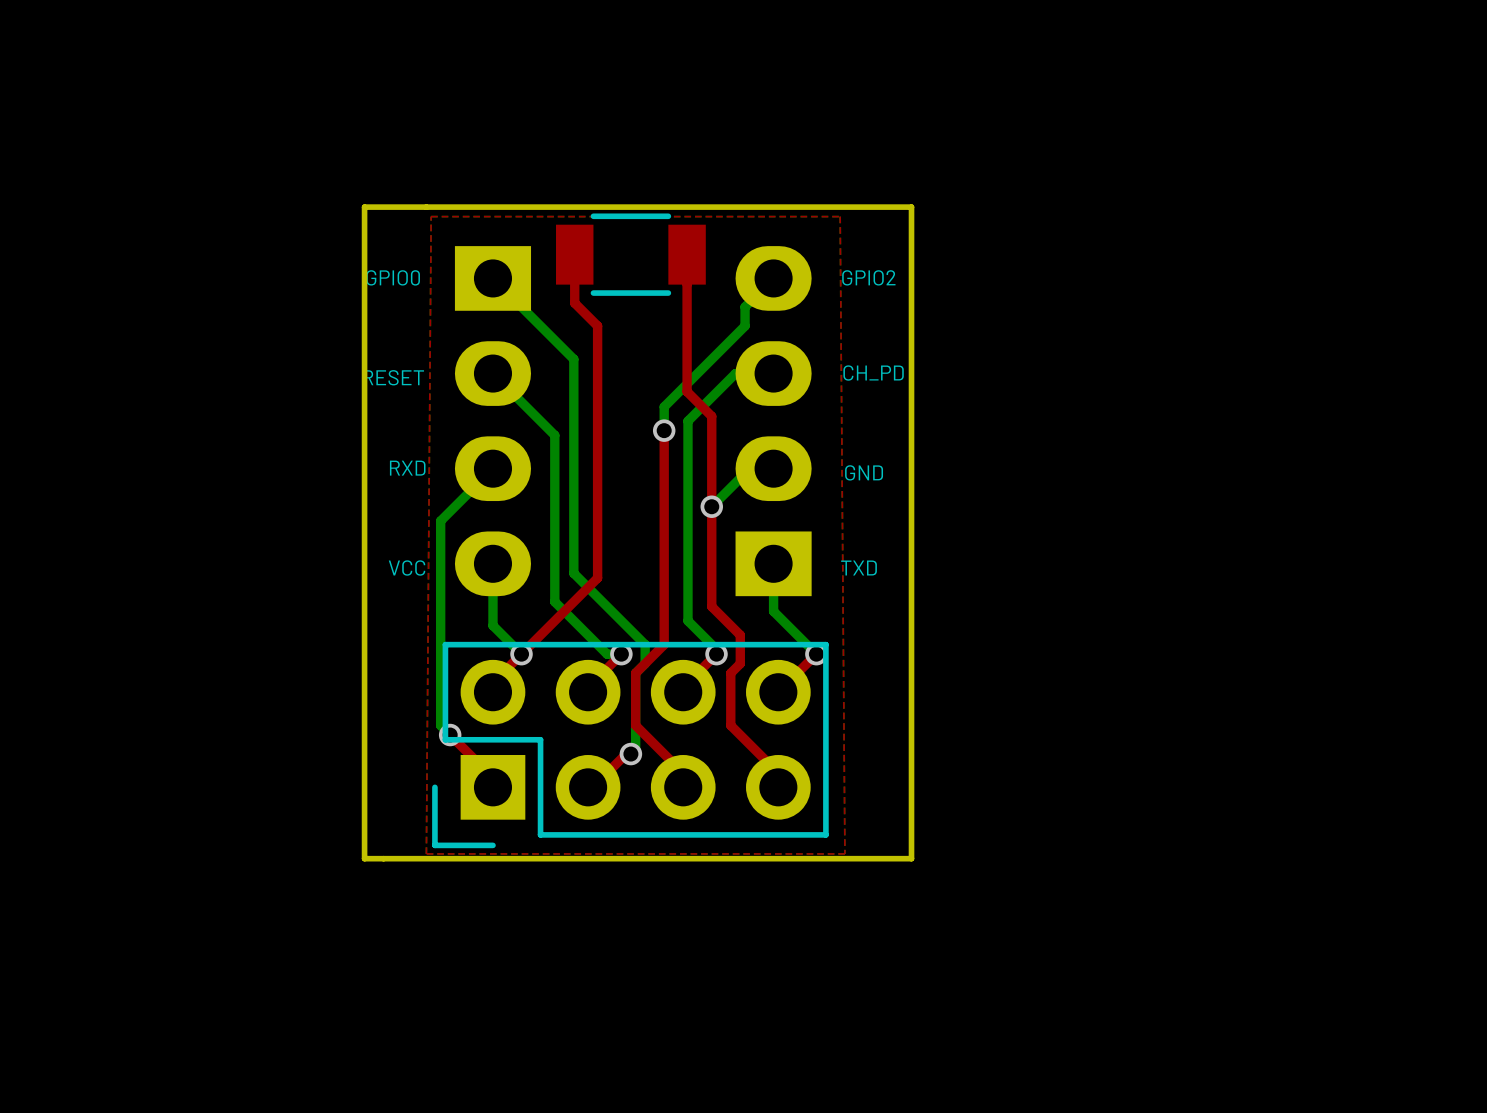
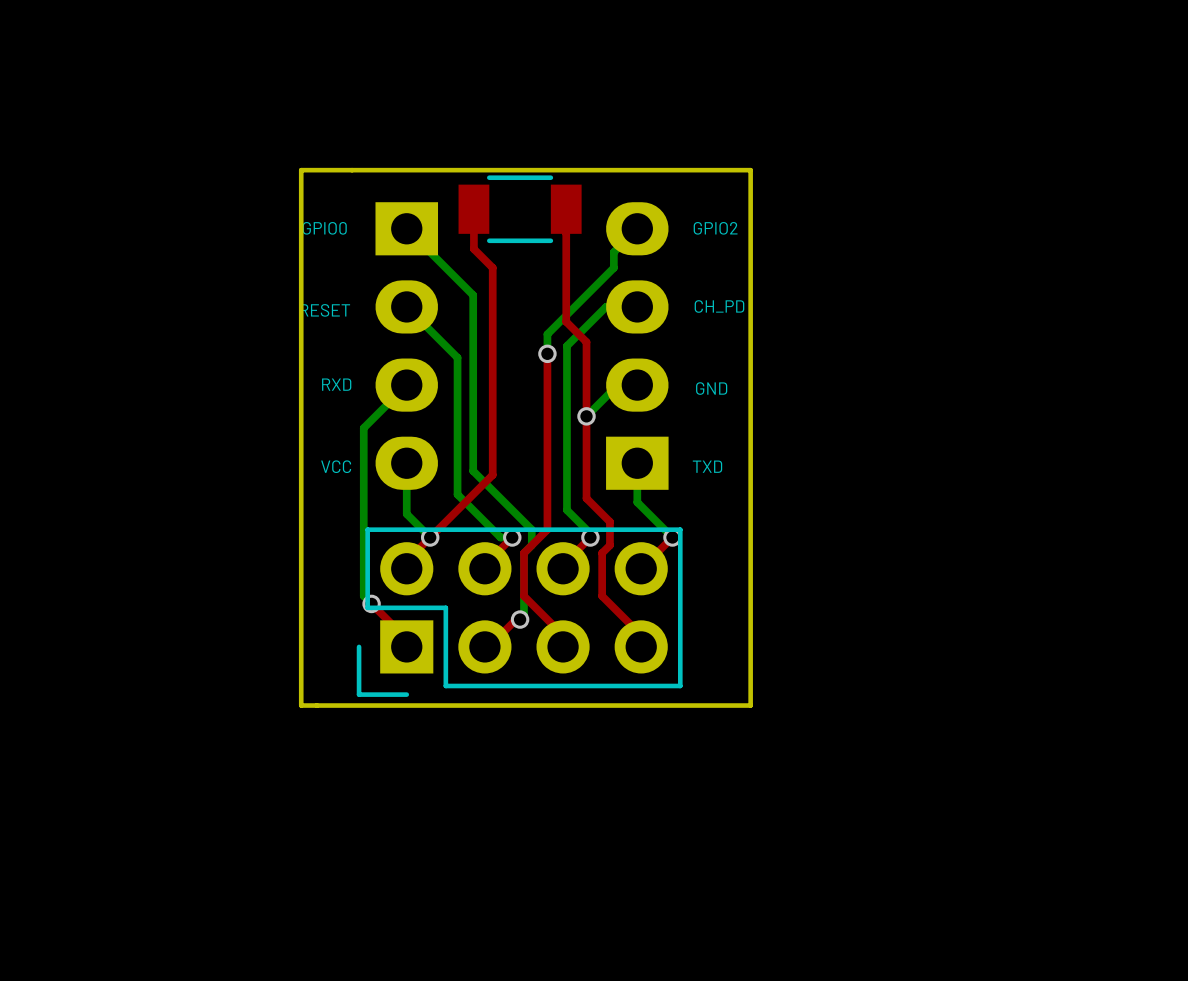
top zone outline: (431, 216) (840, 216) (844, 853) (426, 853) (431, 216) -> none

